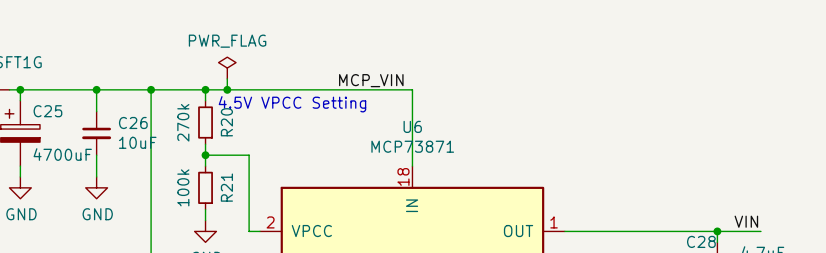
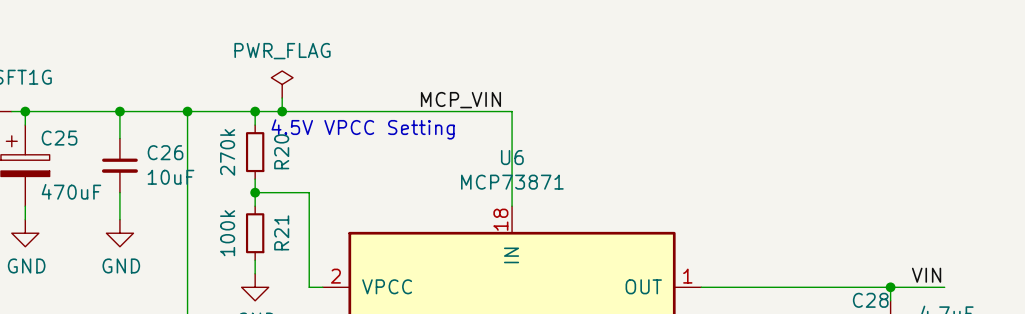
C25 value: 4700uF (62, 154) -> 470uF (71, 191)

